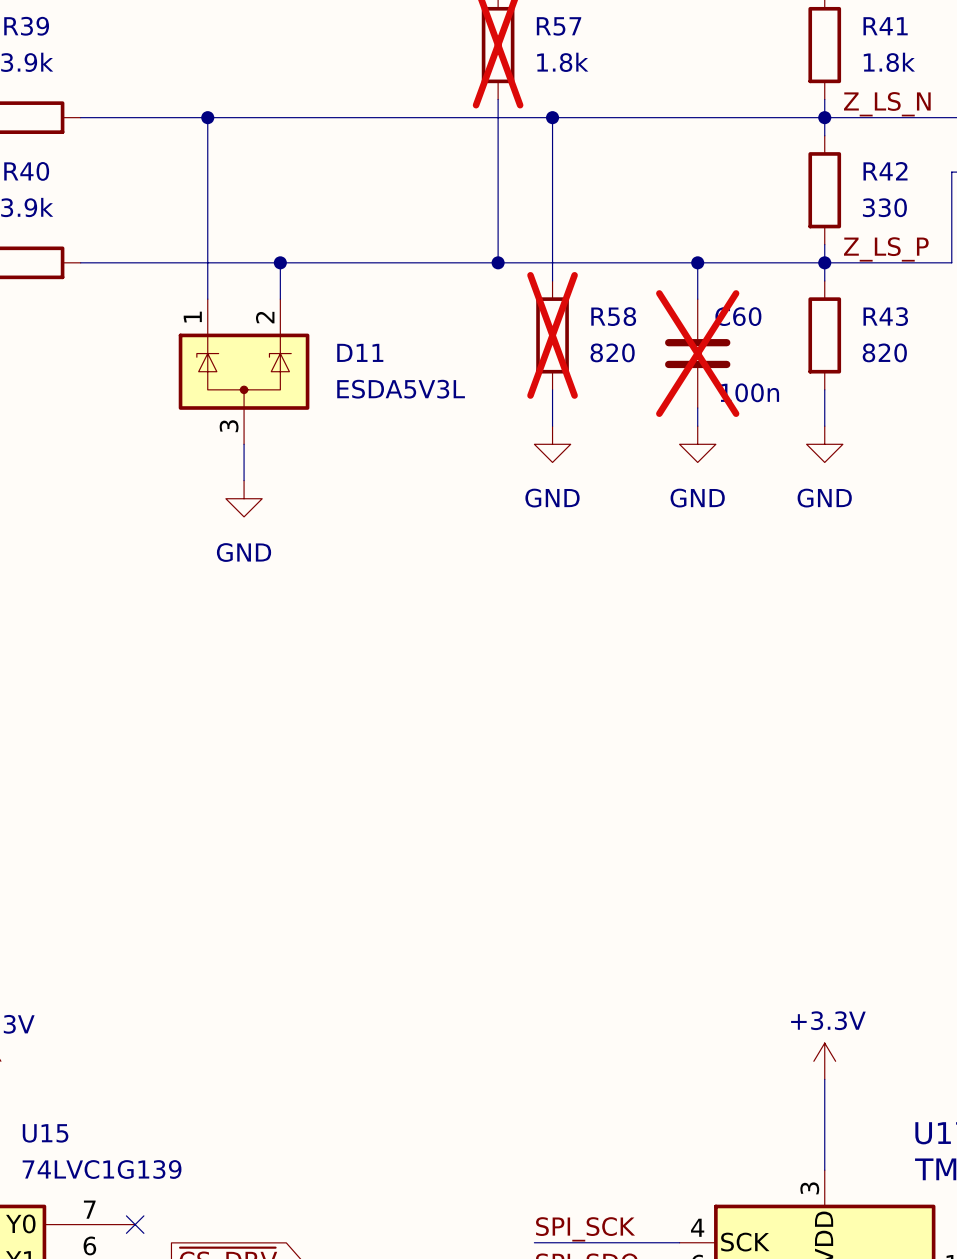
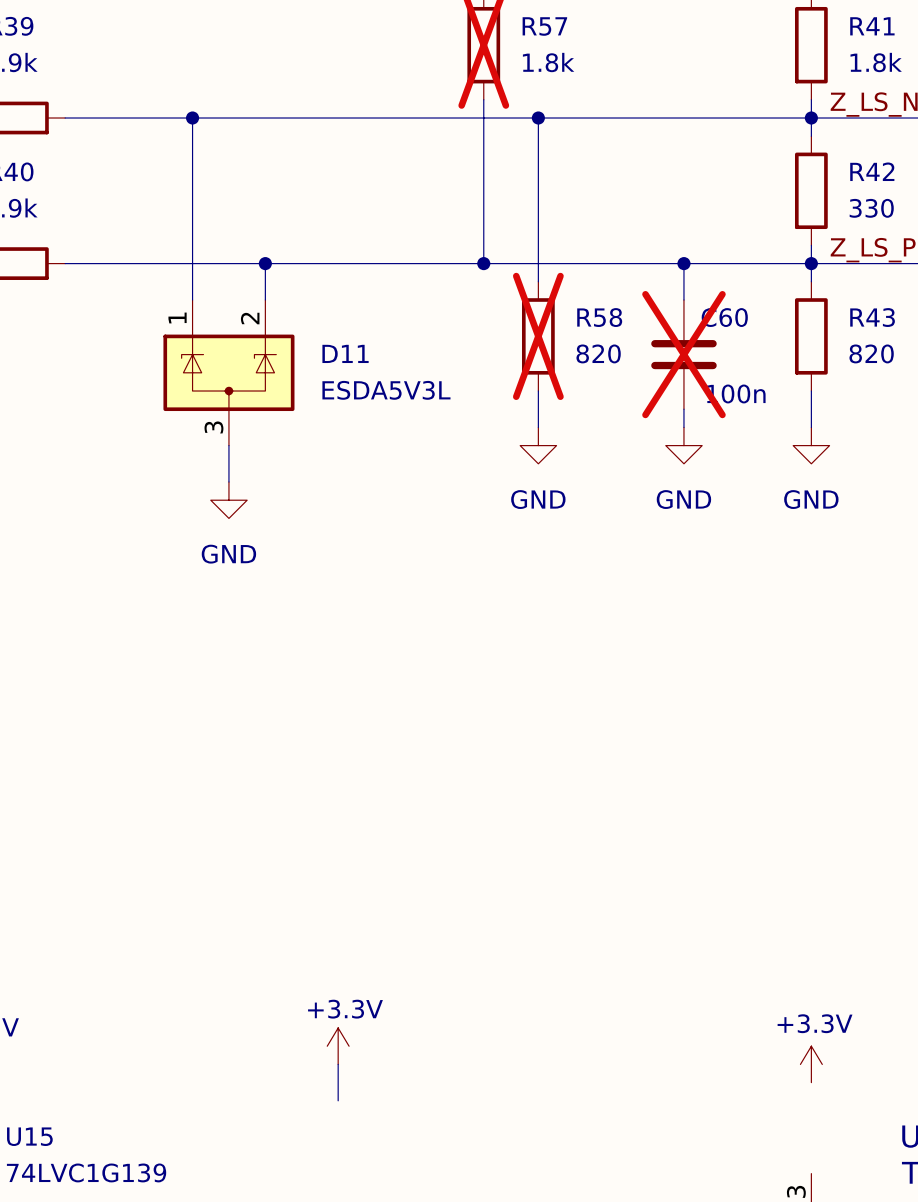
power symbol: none -> +3.3V (338, 1046)
wire: none -> (338, 1064) (338, 1100)
wire: (824, 1079) (824, 1170) -> none

